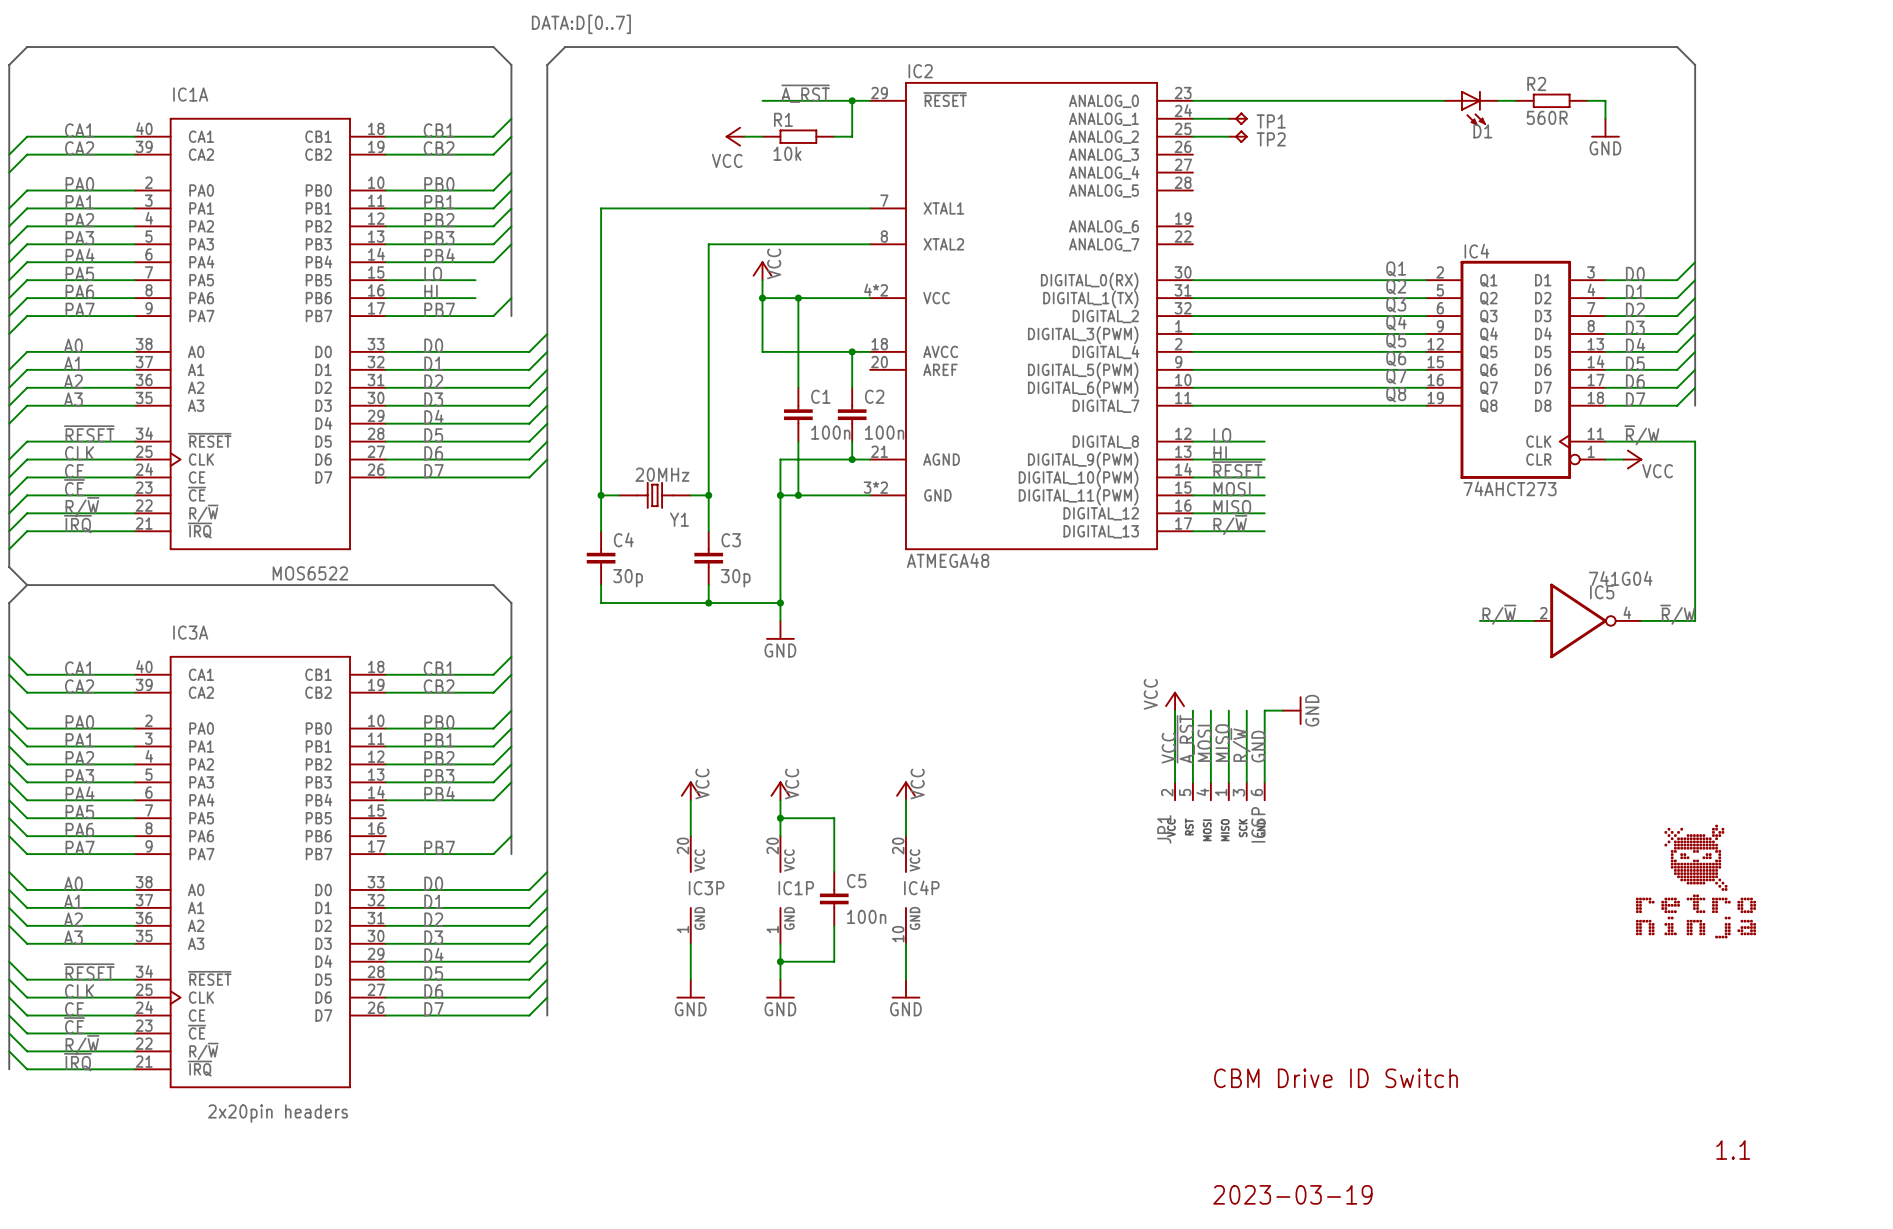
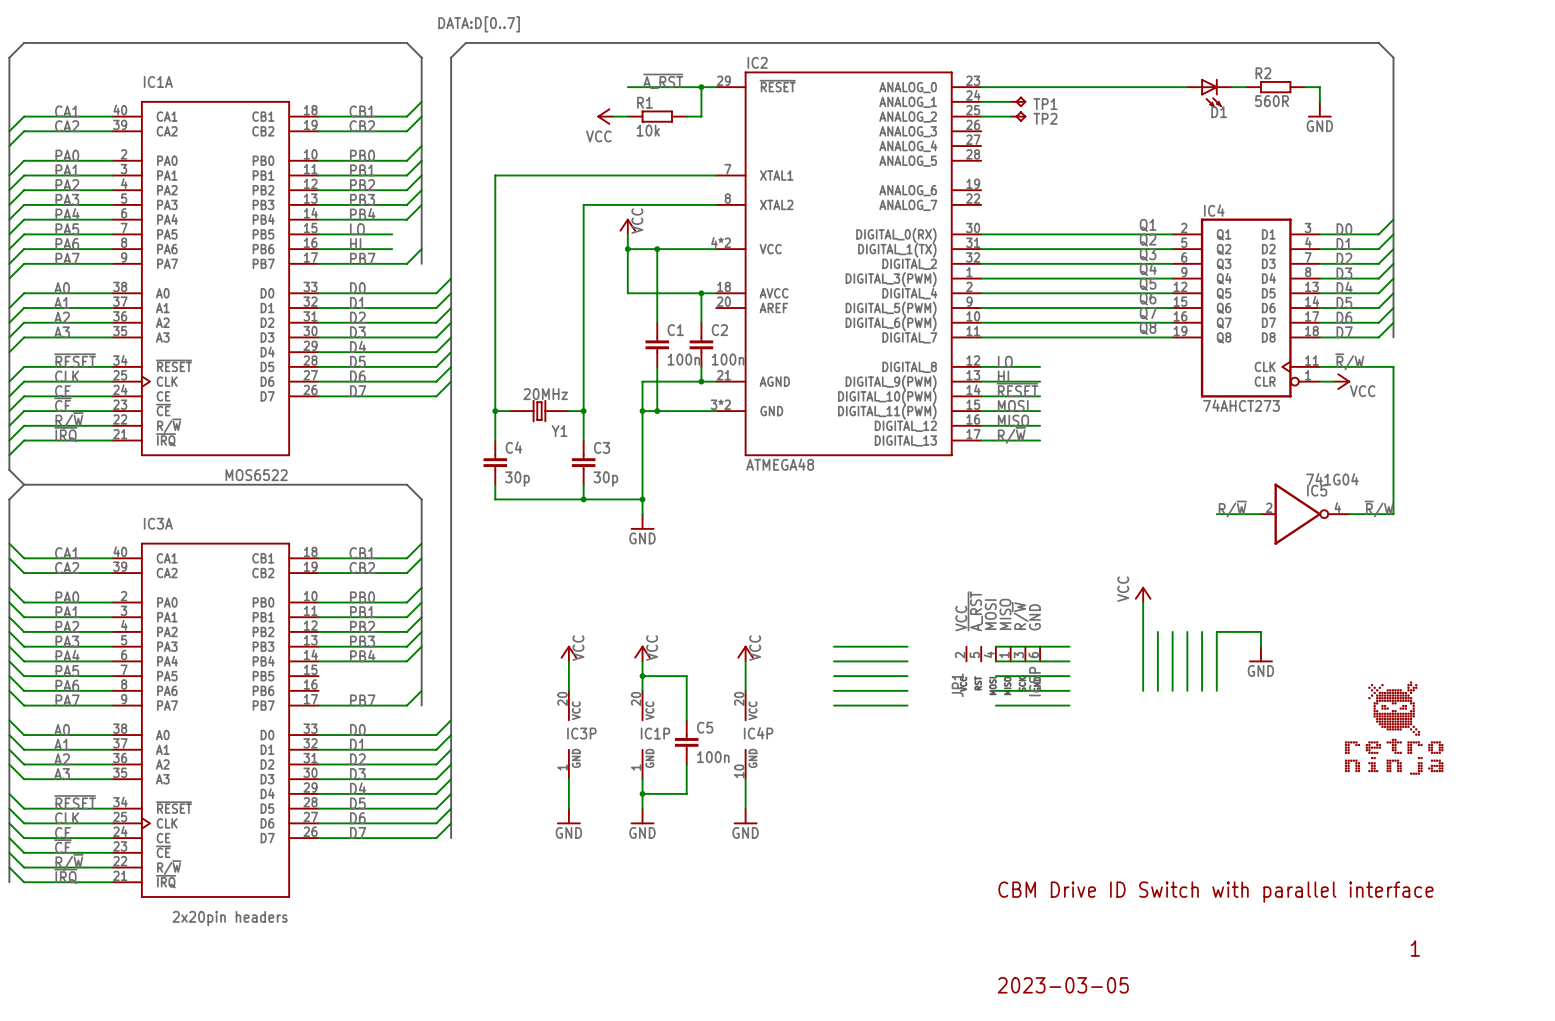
power symbol: VCC (1175, 701) -> none
wire: (1175, 710) (1175, 782) -> none
wire: (1192, 710) (1192, 782) -> none
wire: (1210, 710) (1210, 782) -> (1069, 646) (995, 646)
wire: (1228, 710) (1228, 782) -> none
wire: (1246, 710) (1246, 782) -> (1157, 631) (1157, 690)
wire: (1282, 710) (1264, 710) (1264, 782) -> none
power symbol: GND (1292, 710) -> none
power symbol: none -> VCC (1143, 594)
wire: none -> (1143, 602) (1143, 690)
wire: none -> (1172, 631) (1172, 690)
wire: none -> (1187, 631) (1187, 690)
wire: none -> (1202, 631) (1202, 690)
wire: none -> (833, 646) (907, 646)
wire: none -> (1260, 646) (1260, 631) (1216, 631) (1216, 690)
power symbol: none -> GND (1260, 654)
wire: none -> (833, 661) (907, 661)
wire: none -> (995, 661) (1069, 661)
wire: none -> (833, 676) (907, 676)
wire: none -> (995, 676) (1069, 676)
wire: none -> (833, 690) (907, 690)
wire: none -> (995, 690) (1069, 690)
wire: none -> (833, 705) (907, 705)
wire: none -> (995, 705) (1069, 705)
text: CBM Drive ID Switch (1335, 1078) -> CBM Drive ID Switch with parallel interface (1215, 892)
text: 1.1 (1733, 1150) -> 1 (1415, 948)
text: 2023-03-19 (1292, 1194) -> 2023-03-05 (1063, 985)

